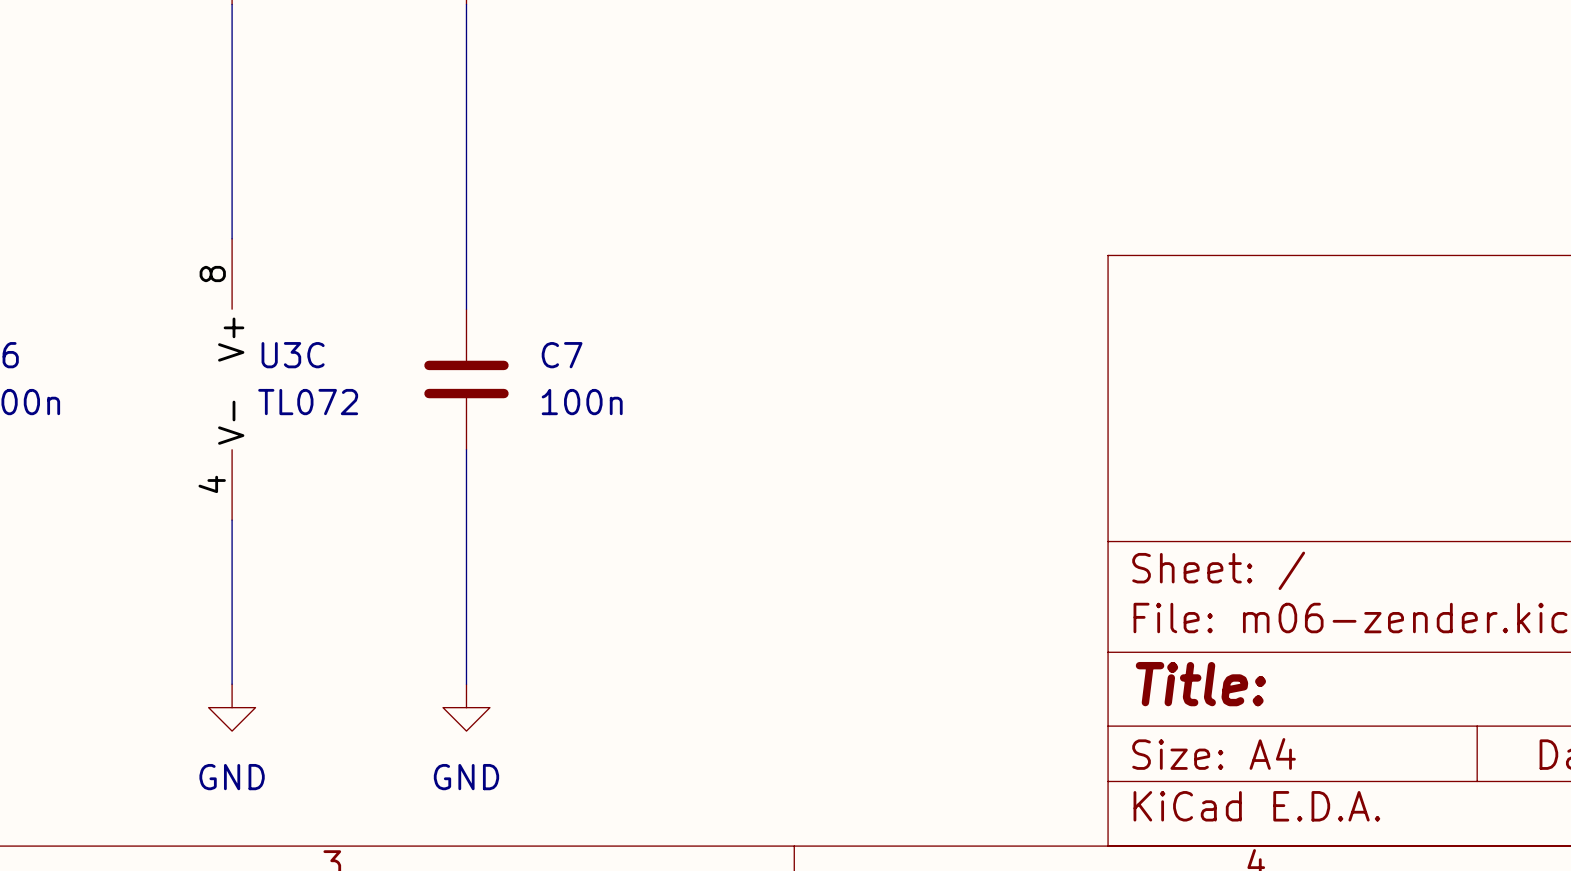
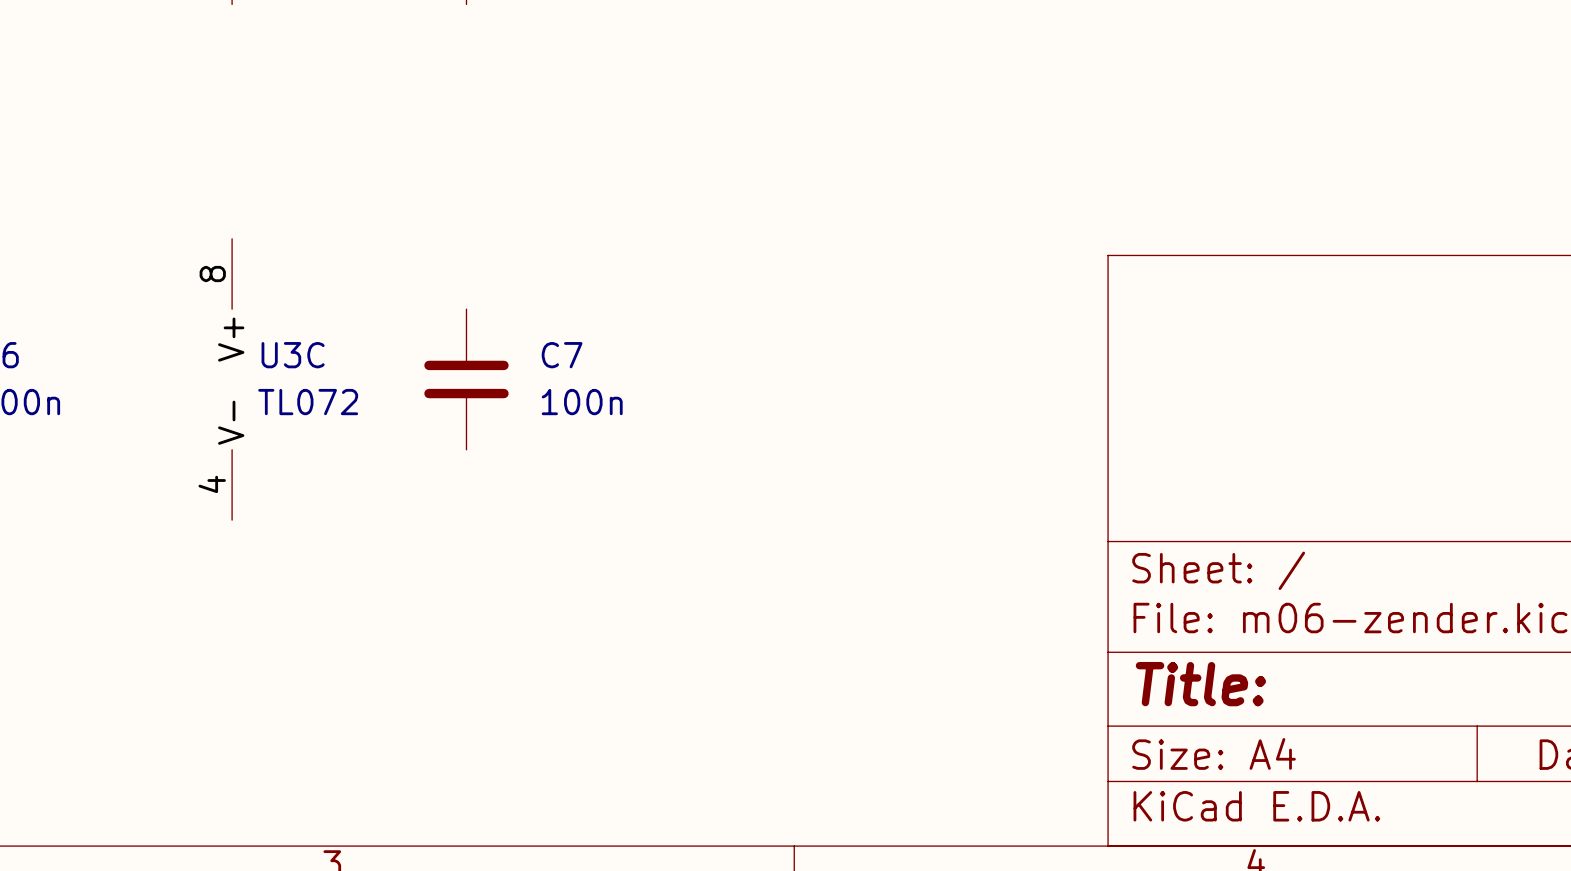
wire: (232, 4) (232, 238) -> none
wire: (466, 4) (466, 309) -> none
wire: (466, 449) (466, 684) -> none
wire: (232, 520) (232, 684) -> none
power symbol: GND (232, 707) -> none
power symbol: GND (466, 707) -> none

